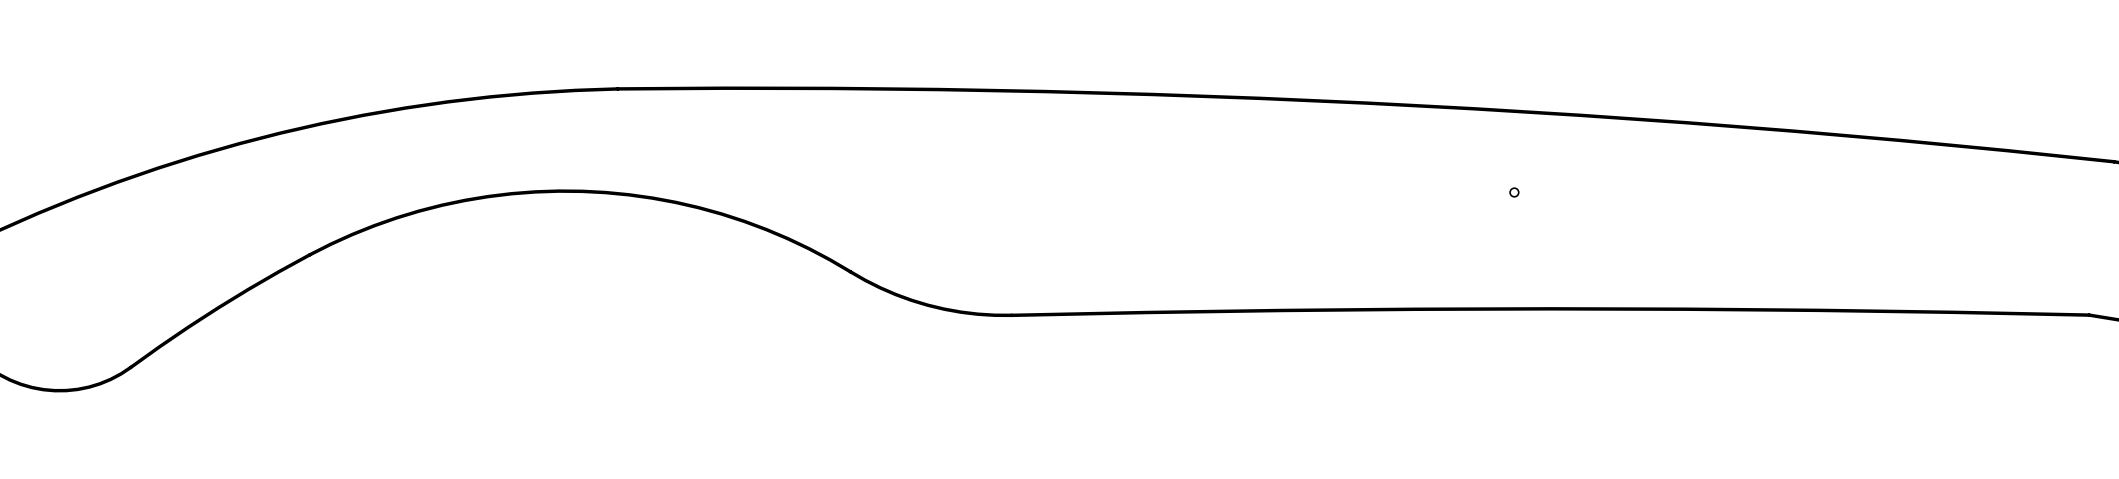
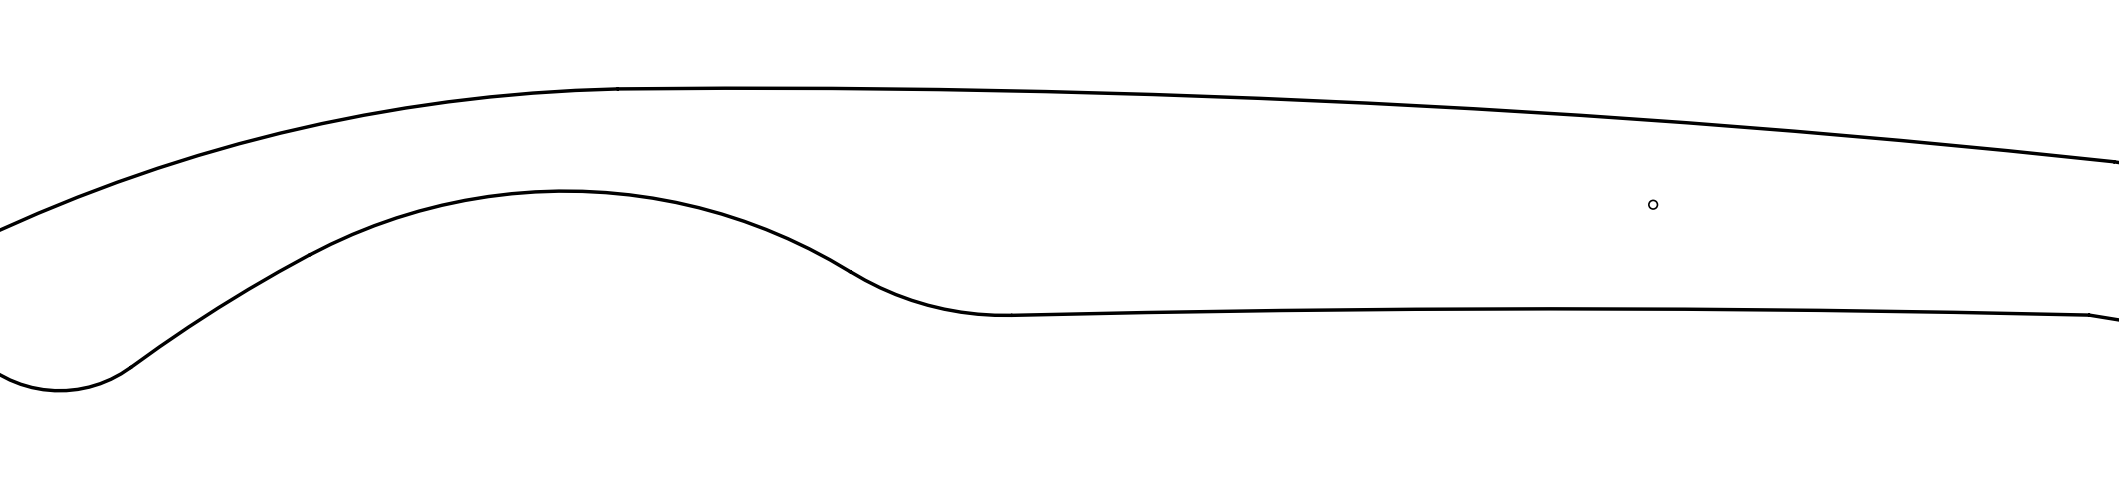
part position: (1514, 192) -> (1653, 204)

